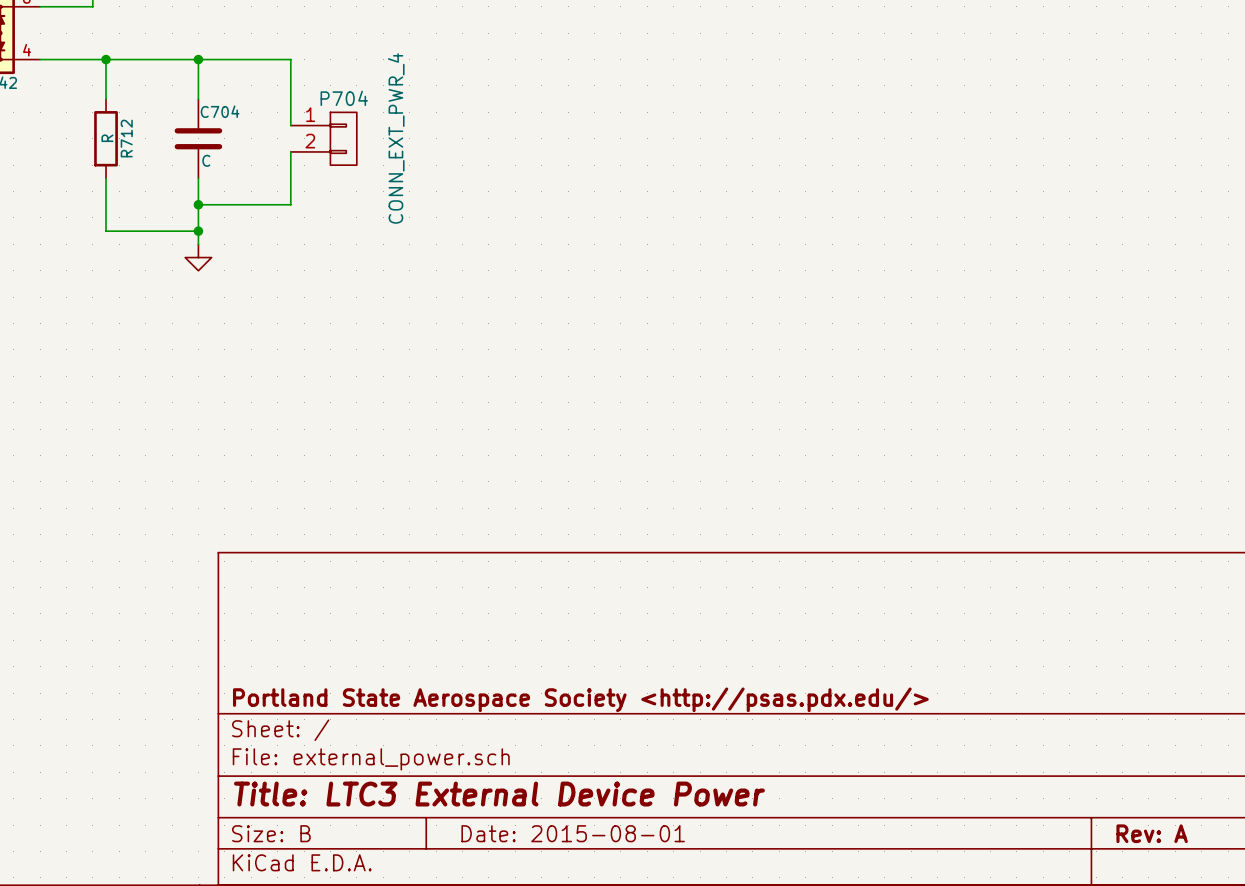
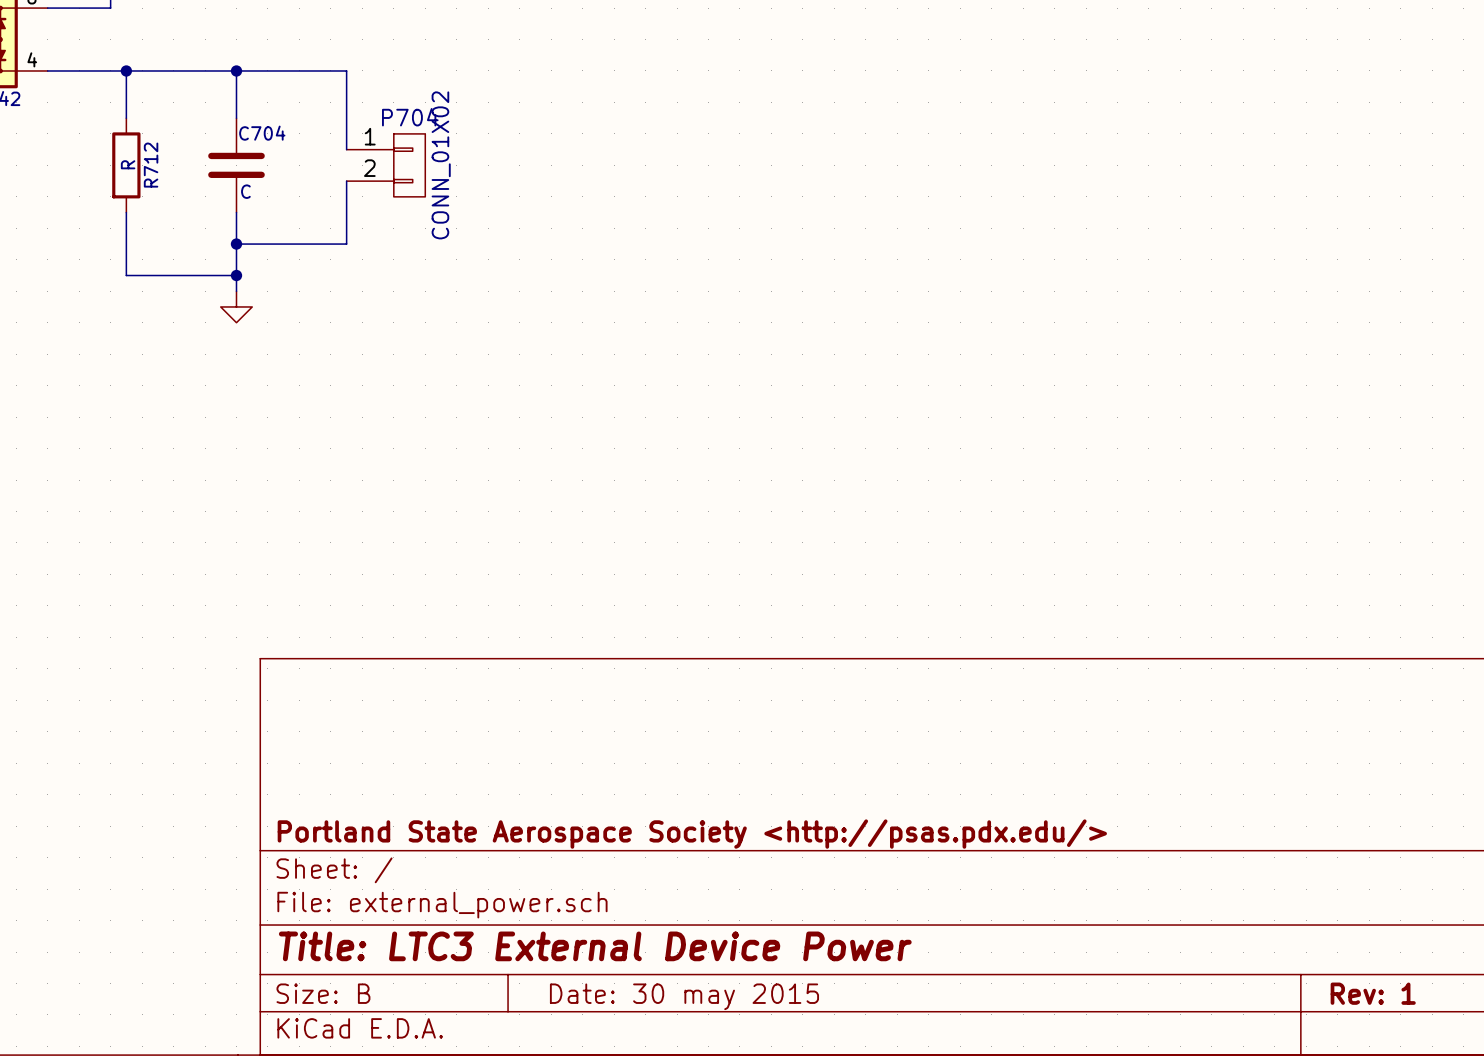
P704 value: CONN_EXT_PWR_4 (396, 138) -> CONN_01X02 (441, 165)
title block: Date: 2015-08-01 (573, 833) -> Date: 30 may 2015 (684, 996)
title block: Rev: A (1152, 833) -> Rev: 1 (1373, 993)

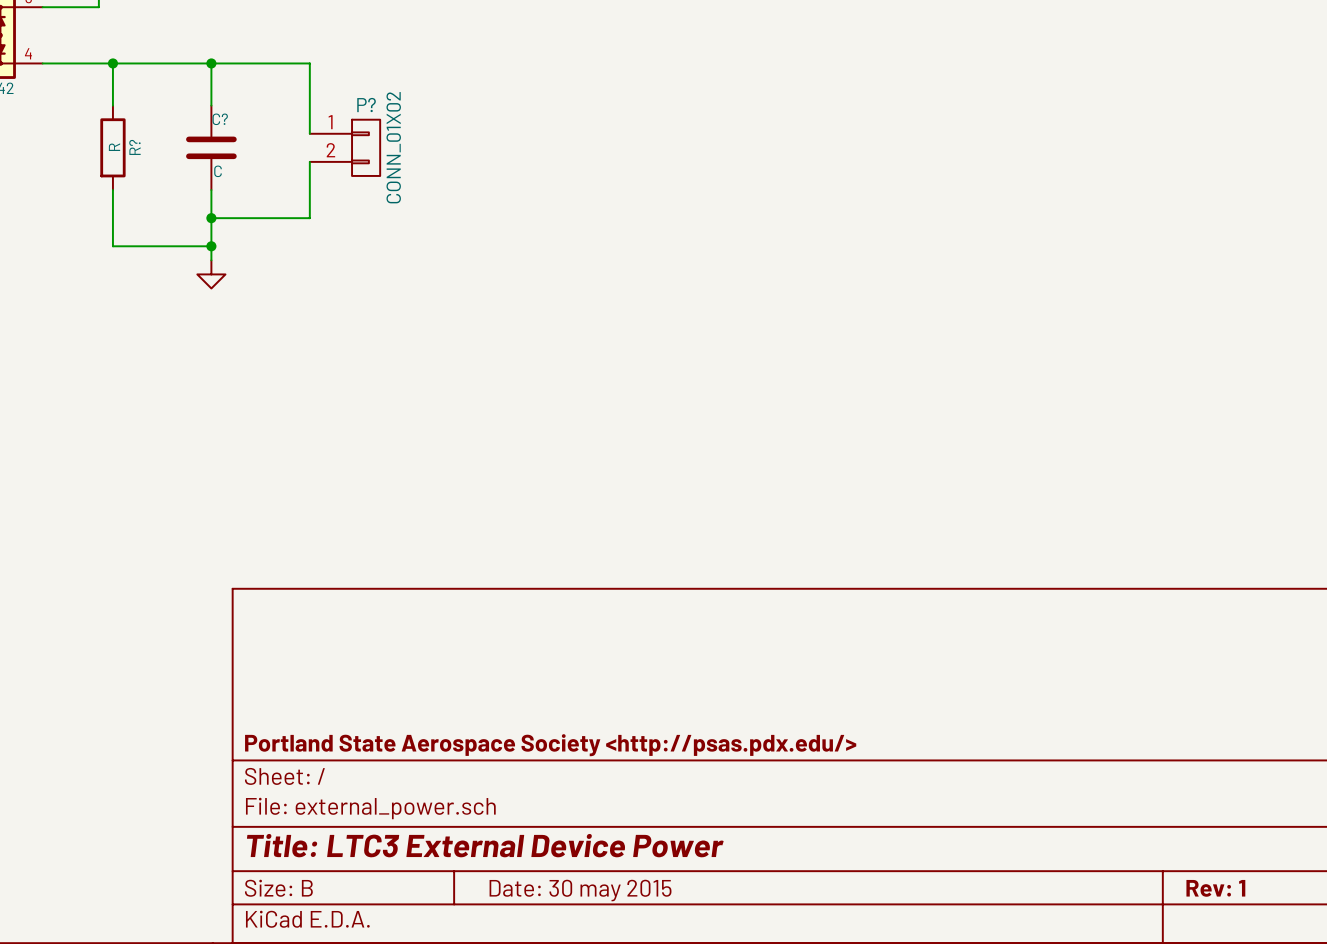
P704 name: P704 (410, 117) -> P? (366, 105)
C704 name: C704 (262, 133) -> C? (220, 119)
R712 name: R712 (151, 165) -> R? (134, 147)

